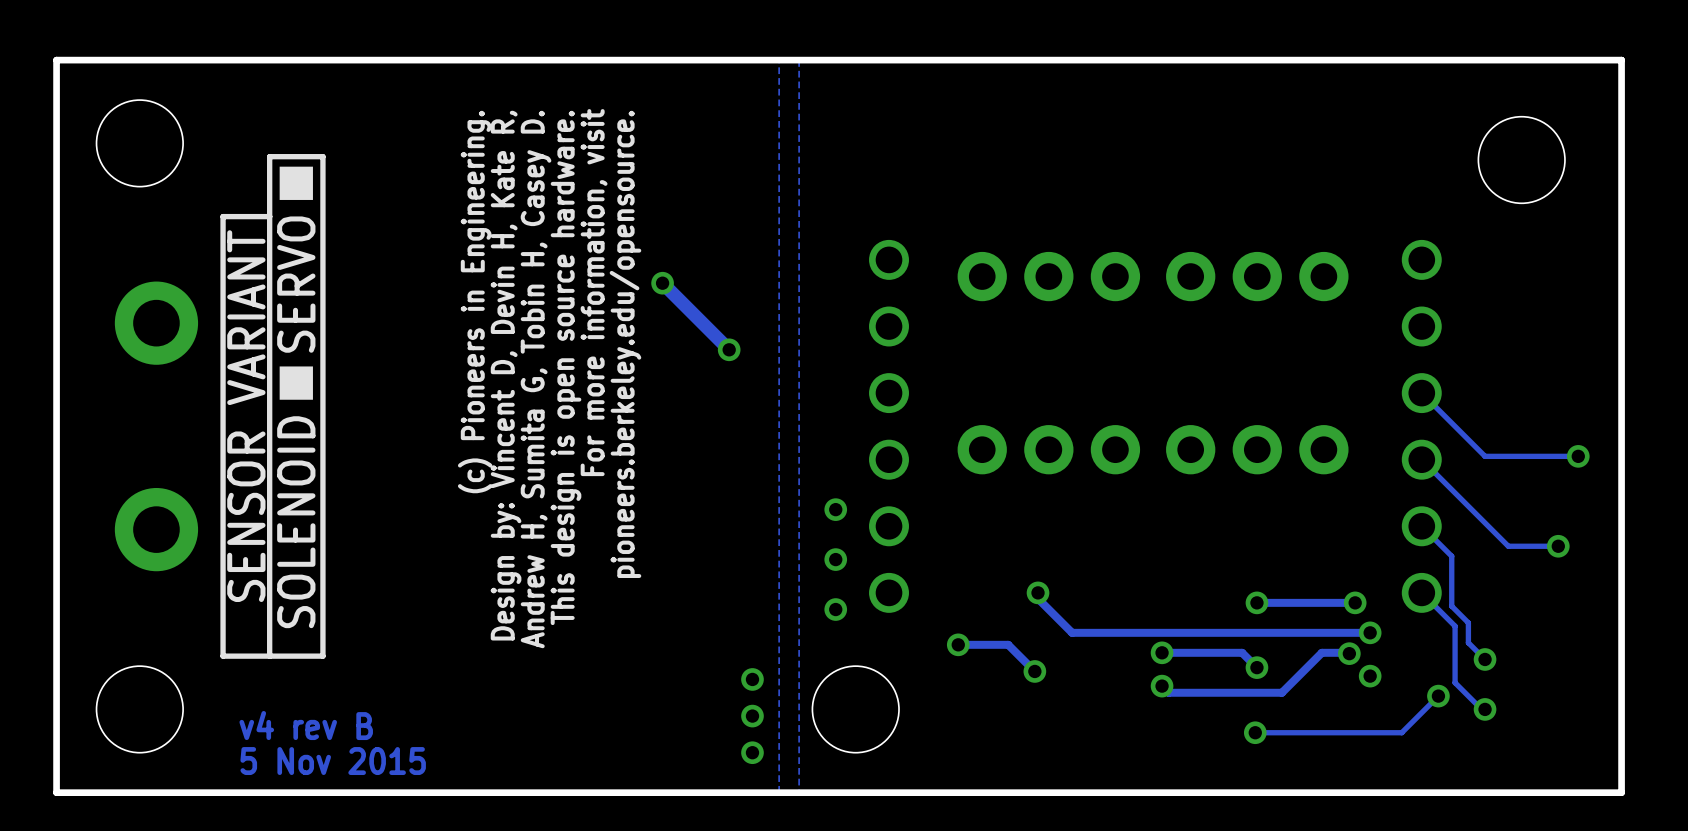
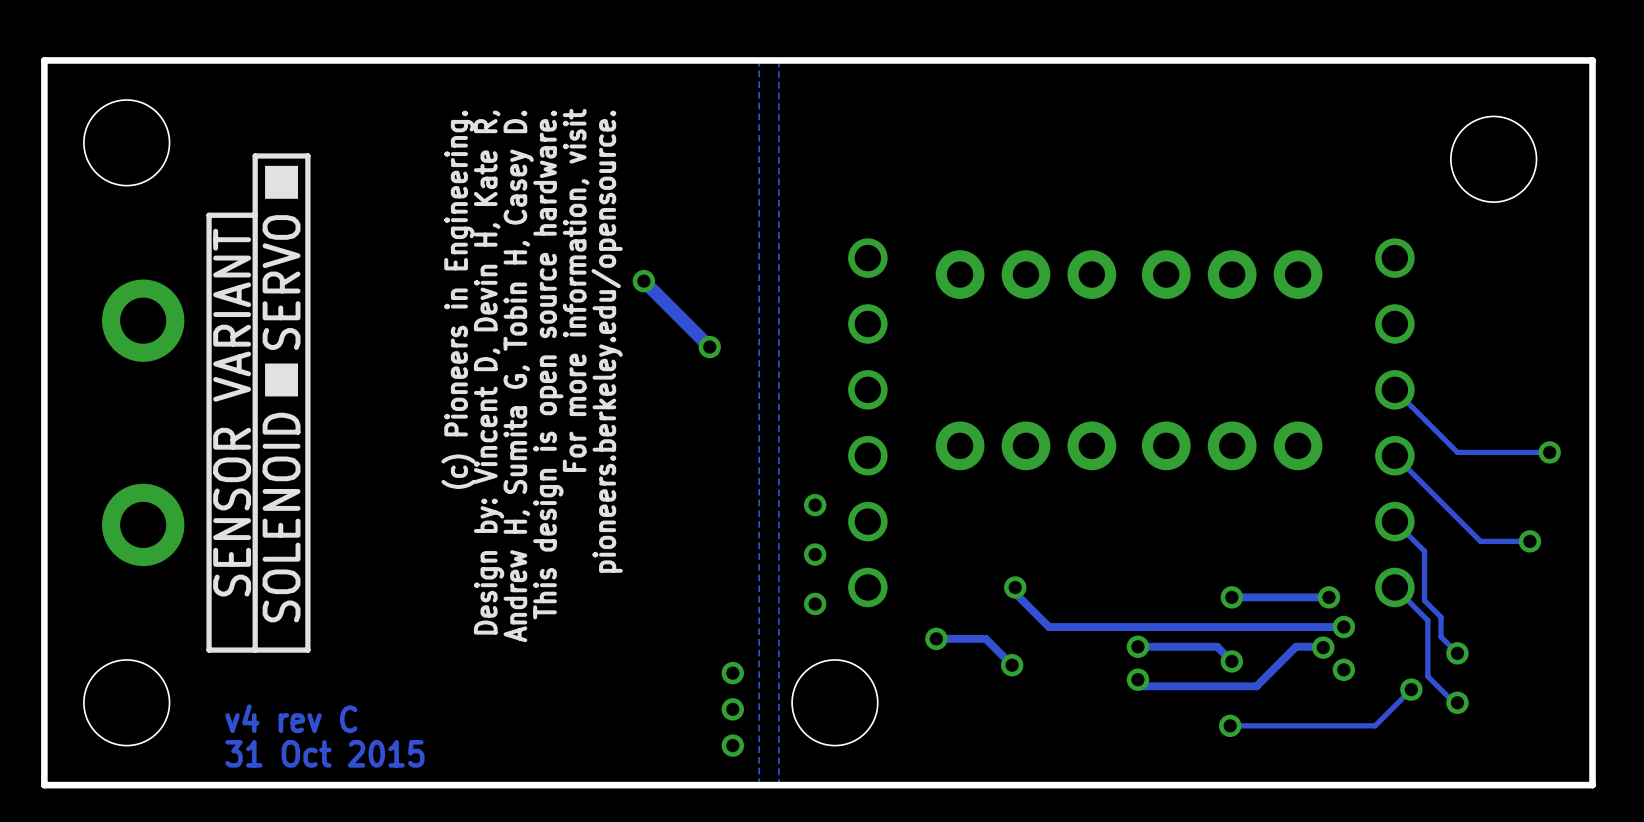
text: v4 rev B (306, 725) -> v4 rev C (291, 718)
text: 5 Nov 2015 (333, 761) -> 31 Oct 2015 (324, 753)

